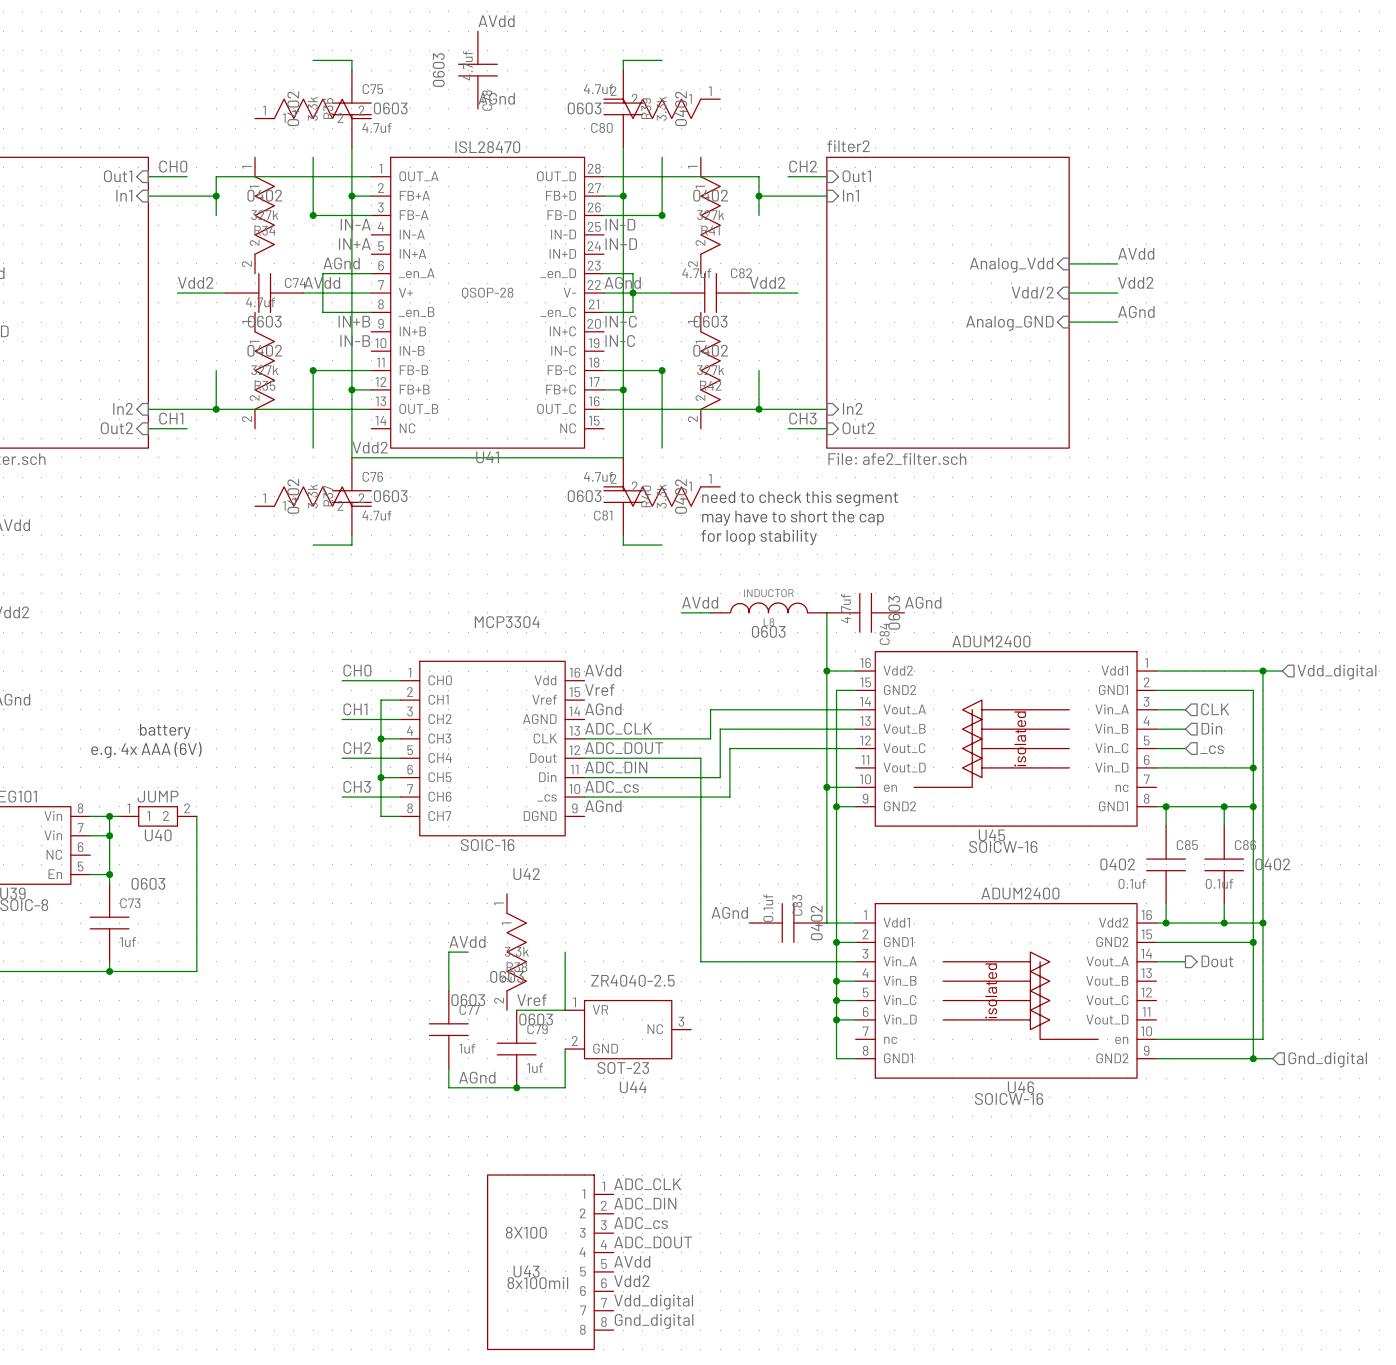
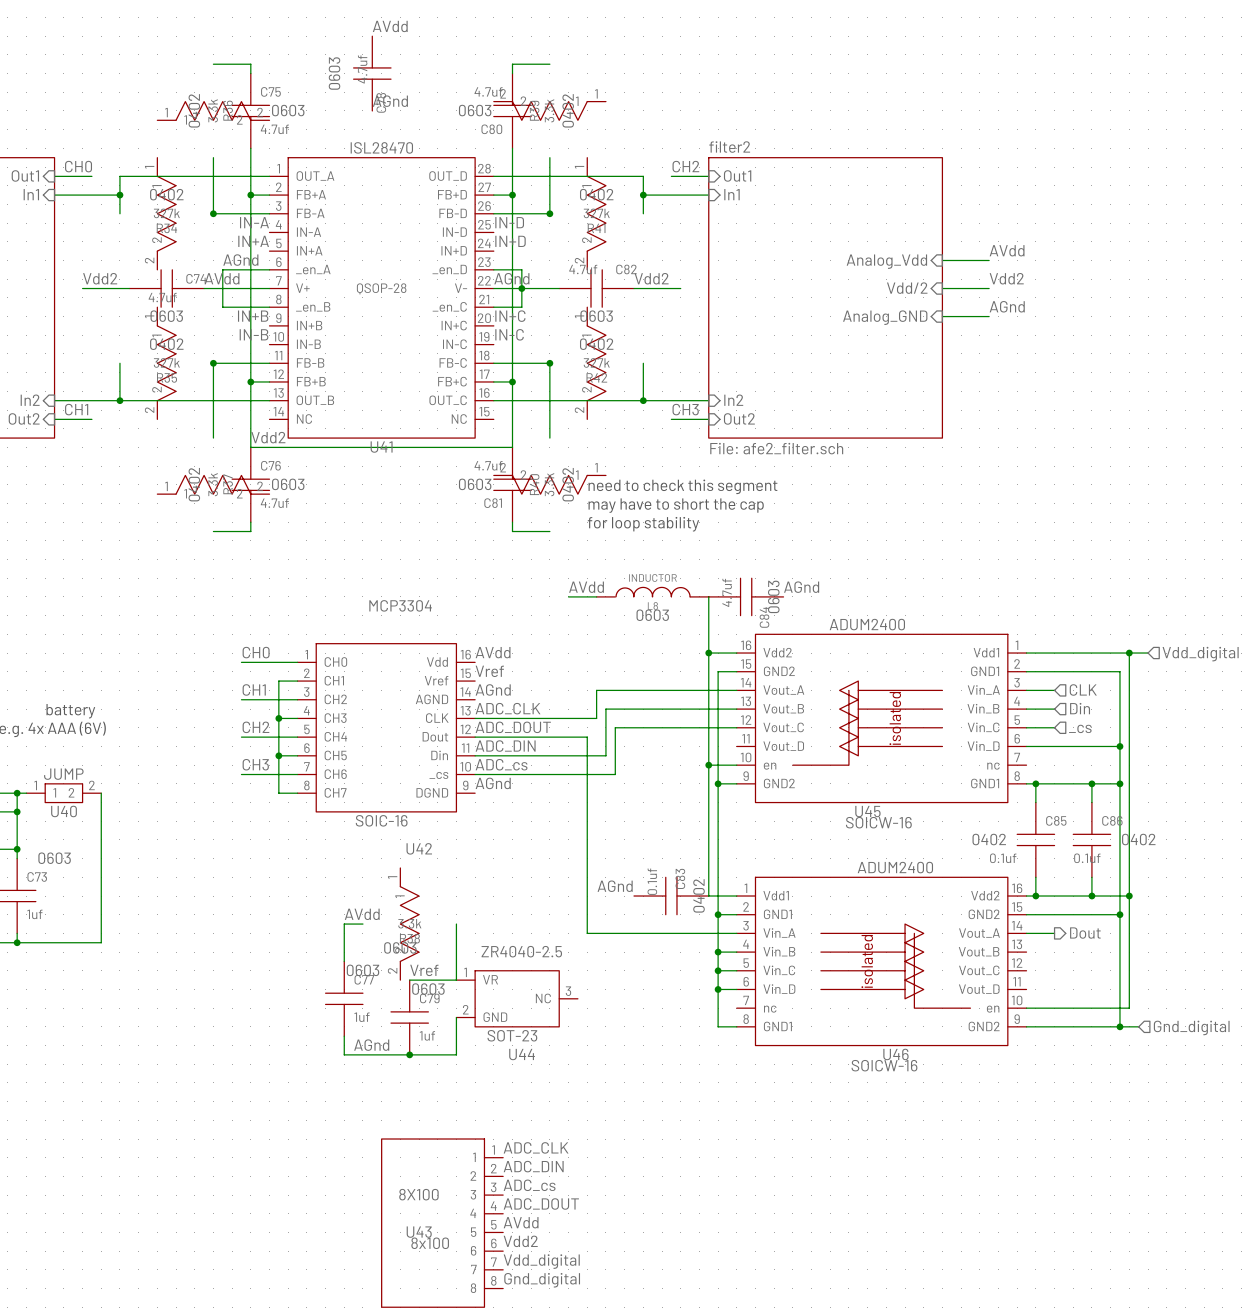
U43 text: 8x100mil (537, 1283) -> 8x100 (430, 1243)

